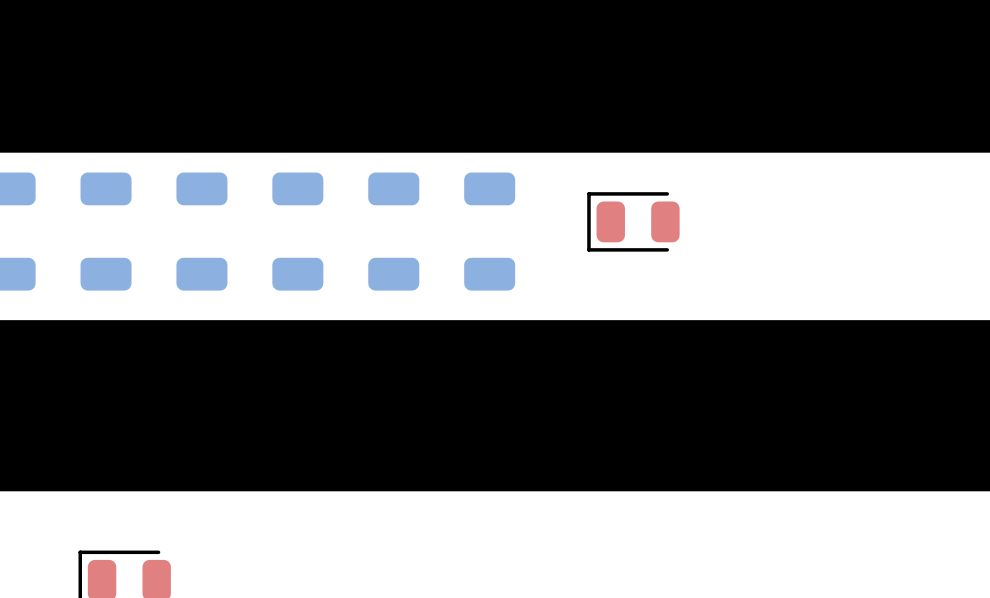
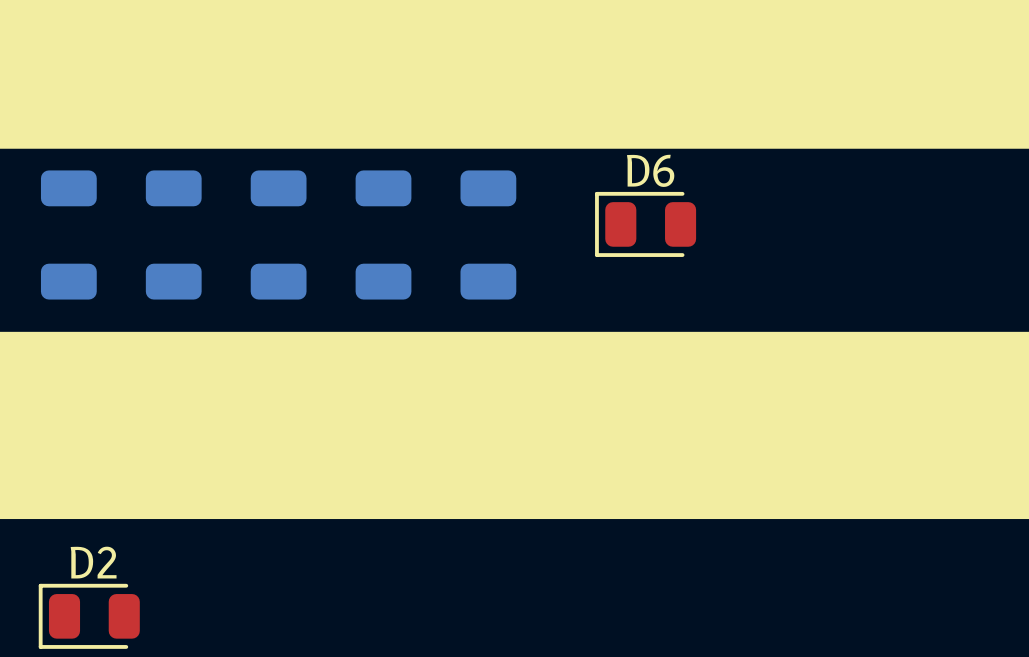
D6 name: none -> D6 (650, 170)
D2 name: none -> D2 (93, 562)

